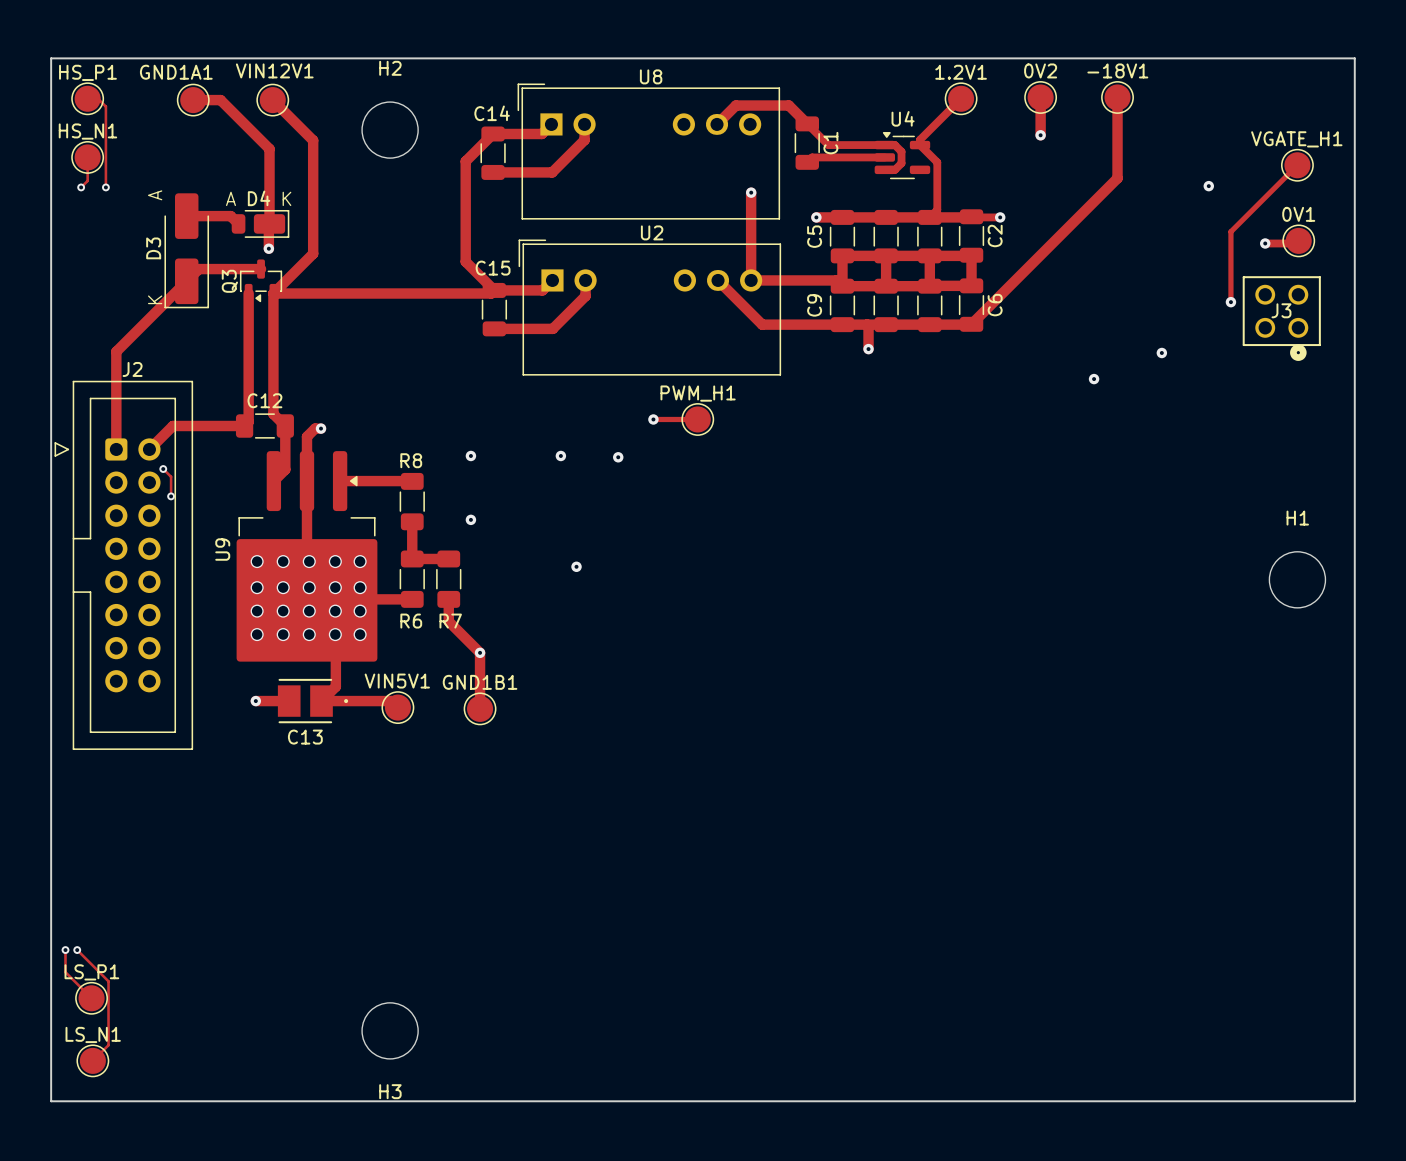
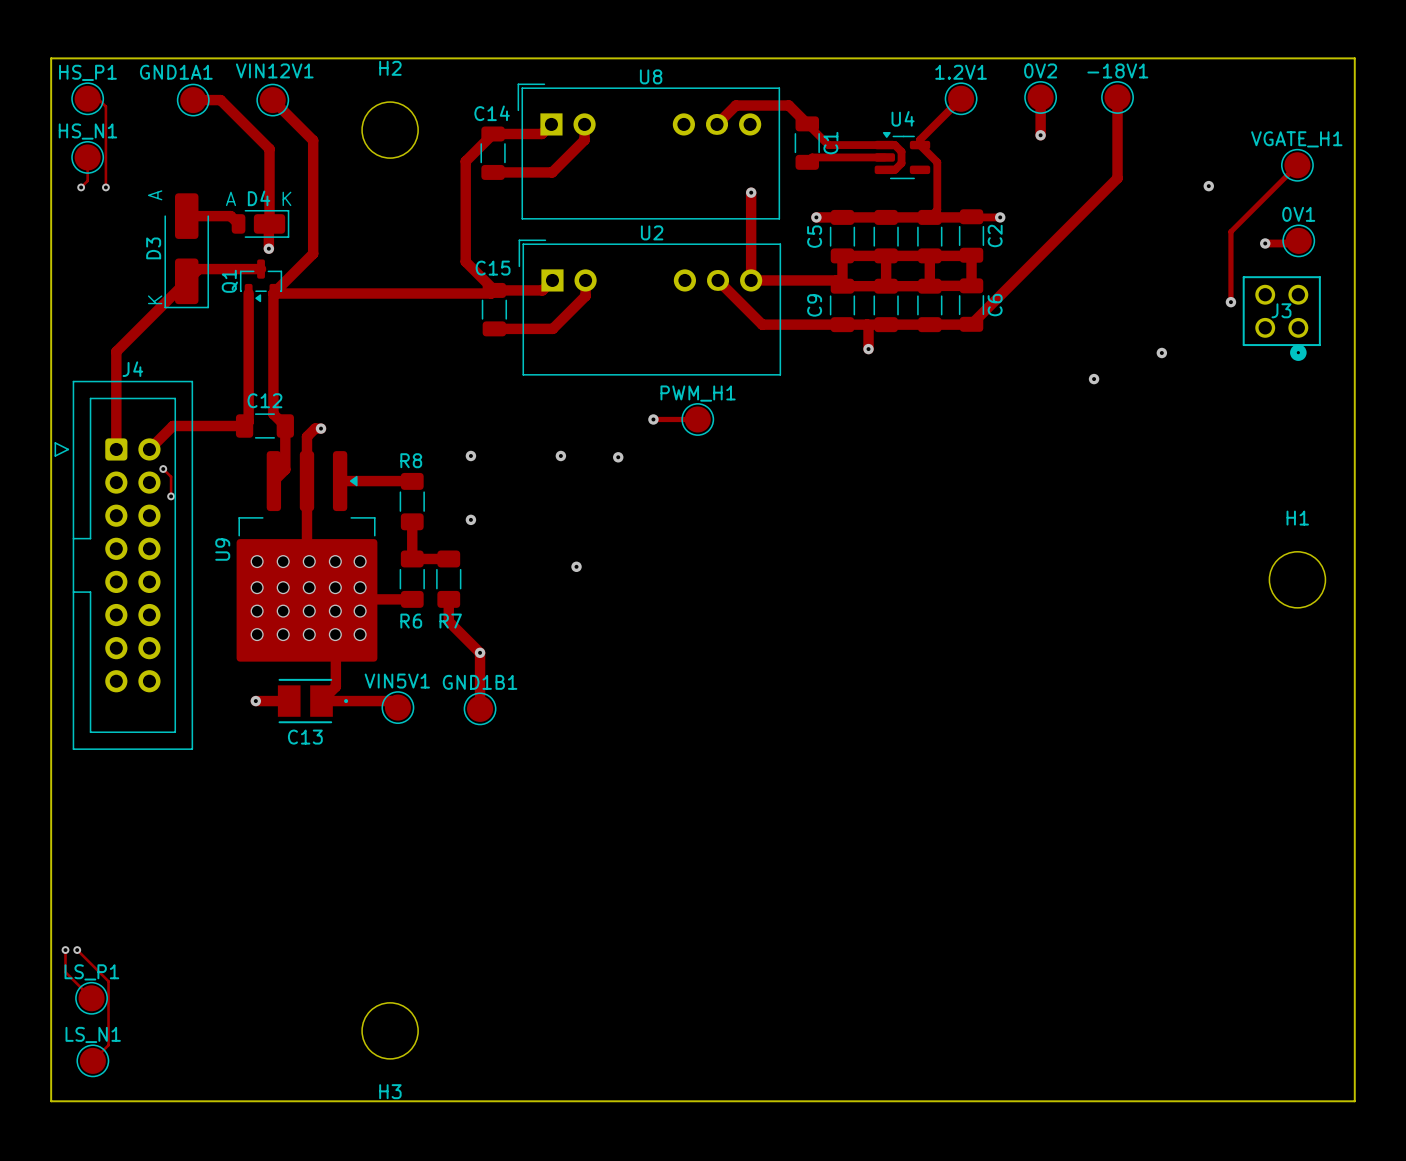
Q3 name: Q3 (229, 281) -> Q1 (229, 281)
J2 name: J2 (132, 369) -> J4 (132, 369)

